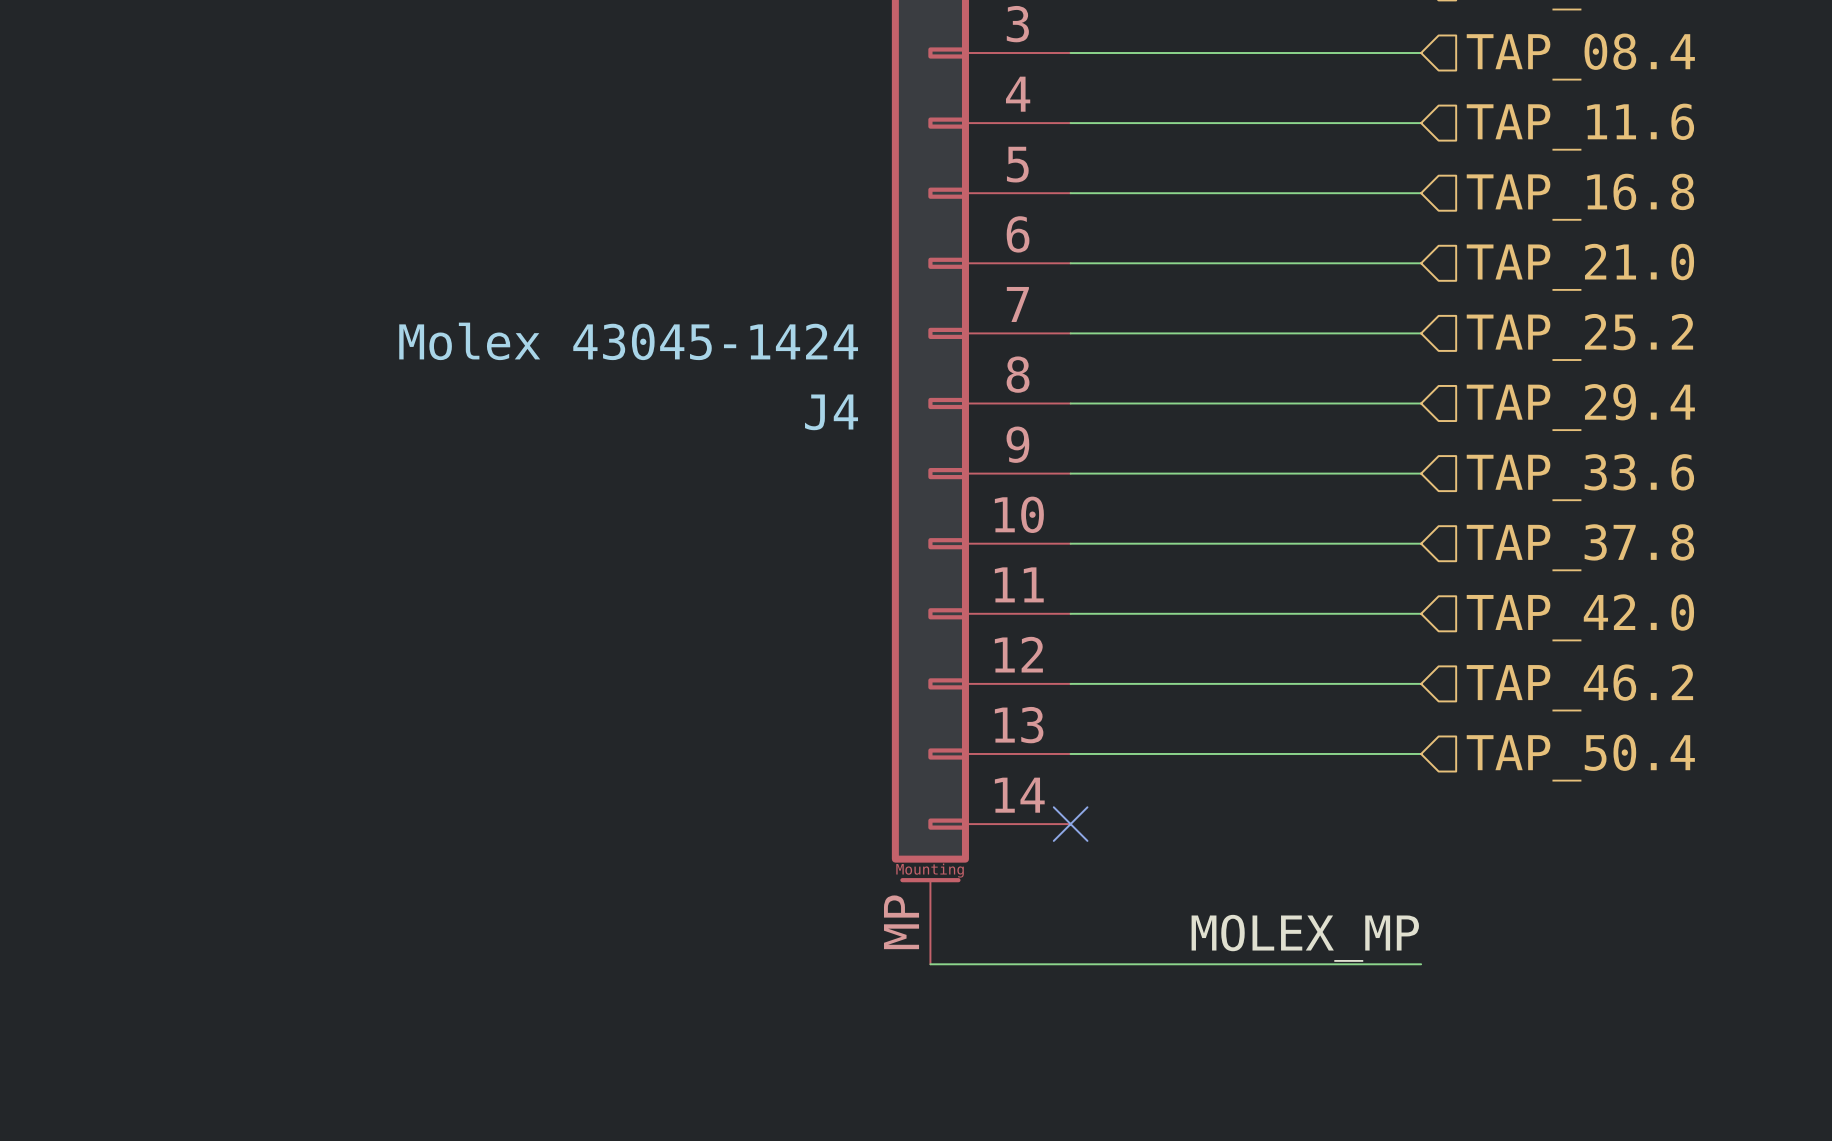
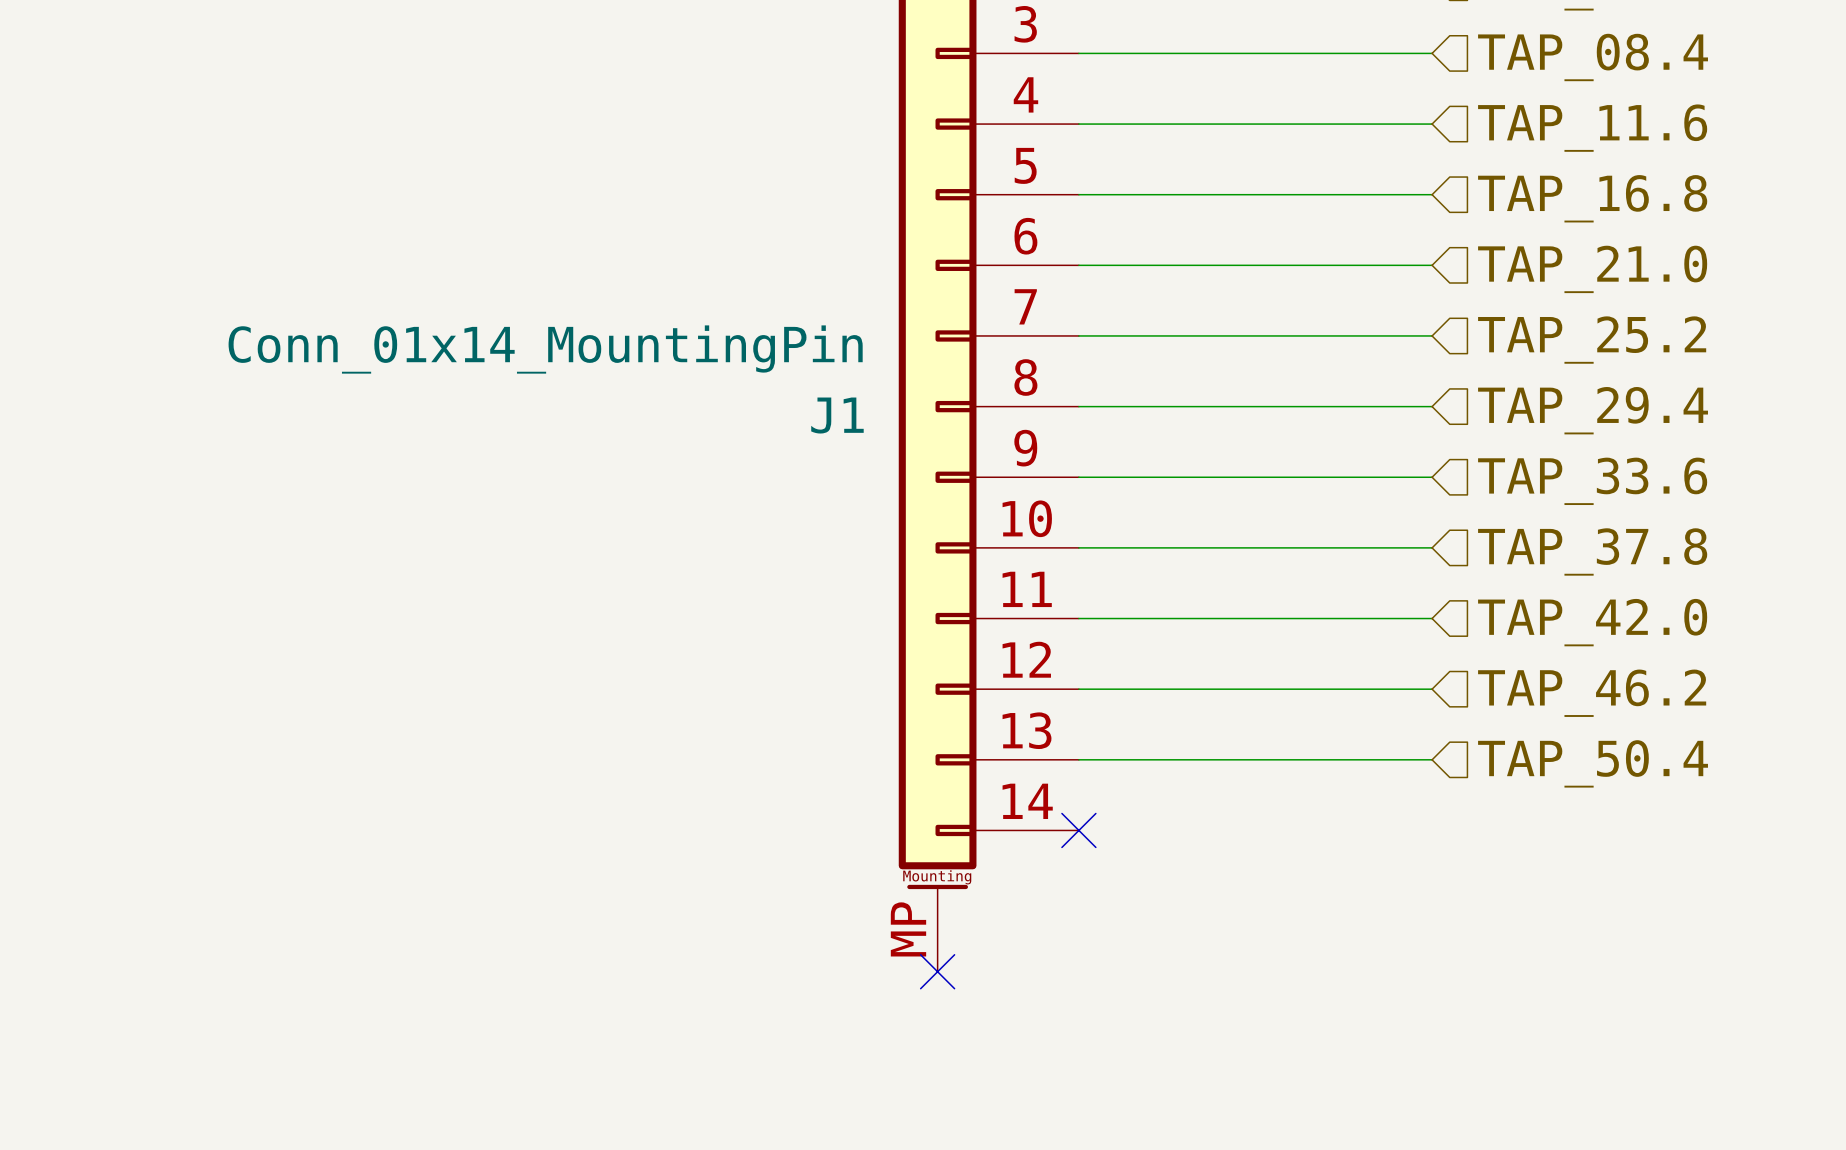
J4 value: Molex 43045-1424 (628, 341) -> Conn_01x14_MountingPin (545, 349)
J4 name: J4 (831, 412) -> J1 (837, 415)
label: MOLEX_MP (1305, 938) -> none
wire: (930, 964) (1421, 964) -> none
no-connect mark: none -> (937, 971)

